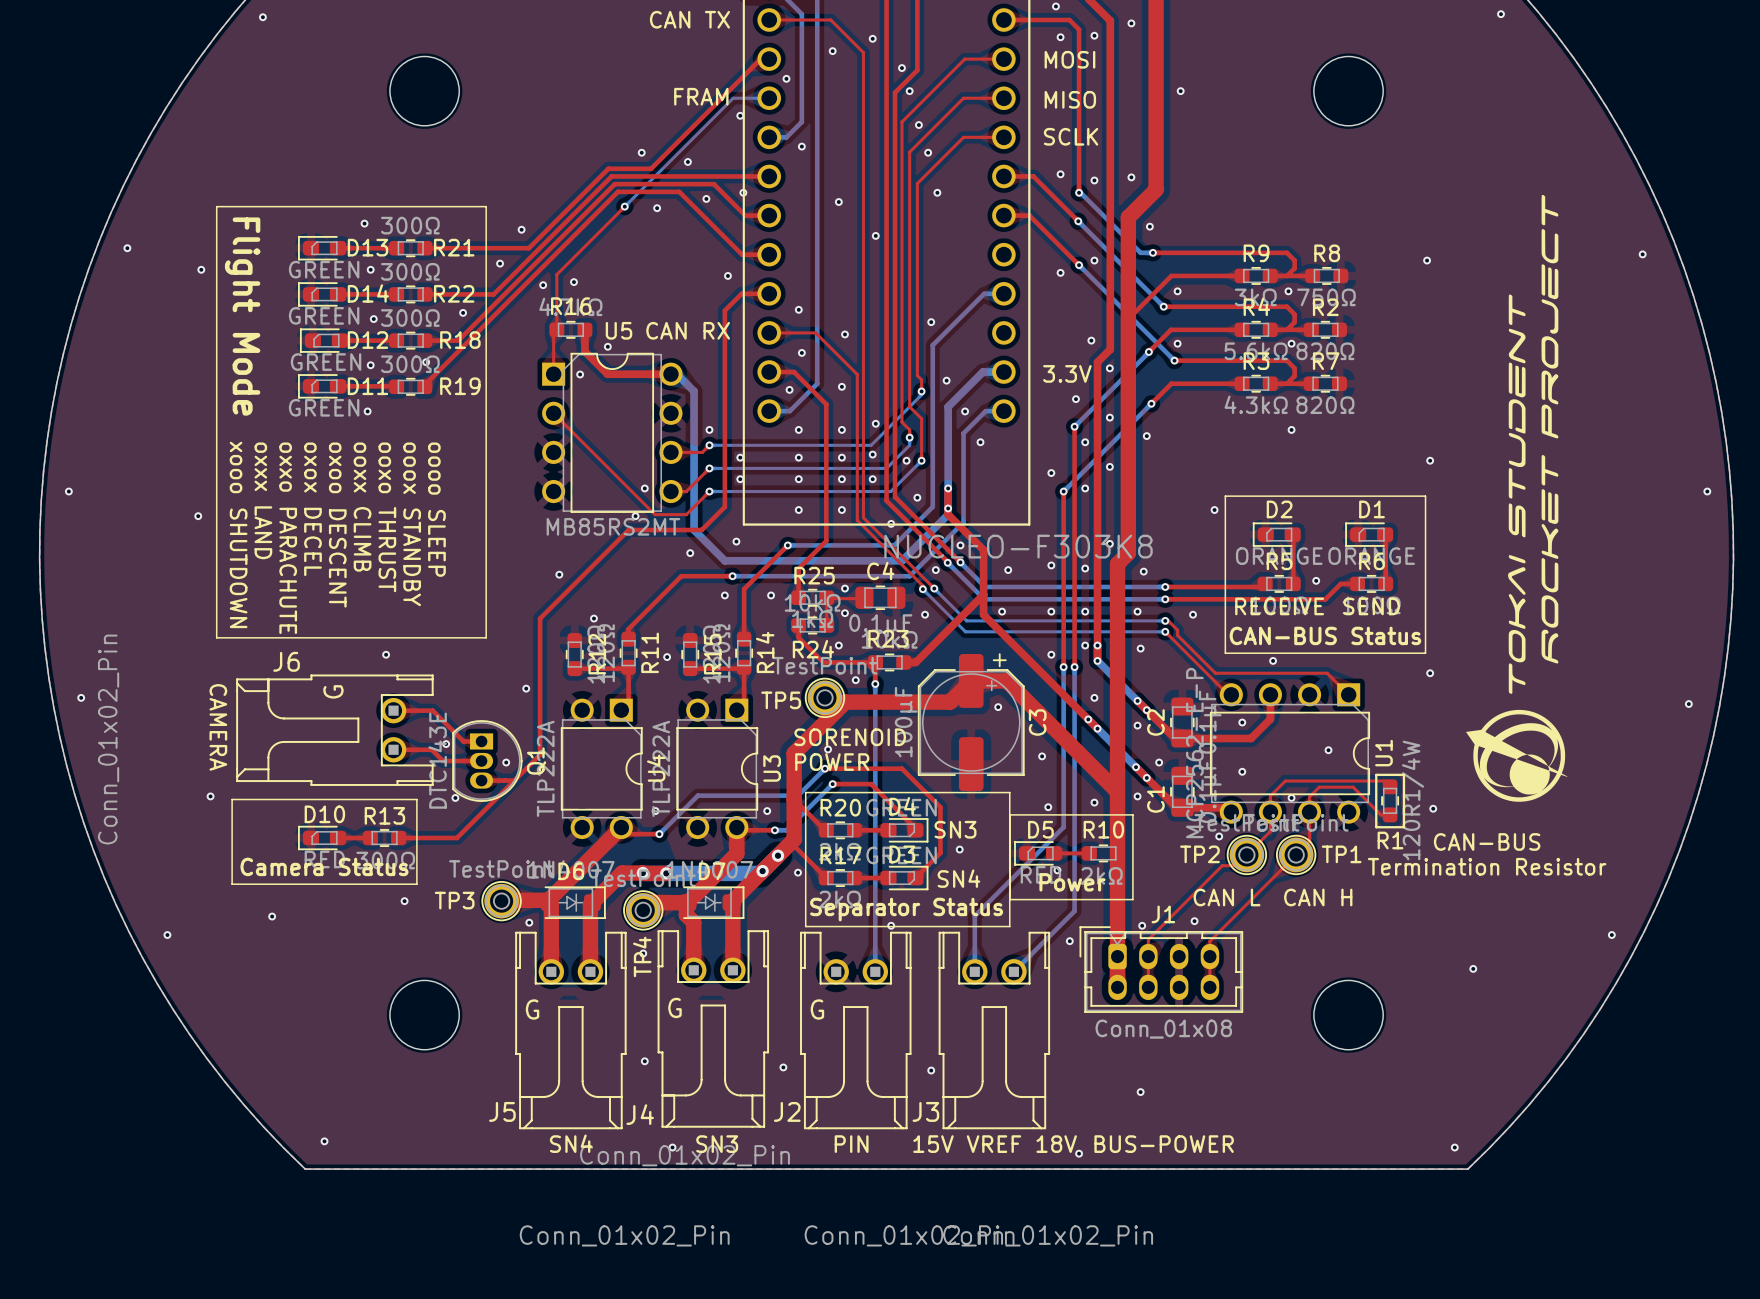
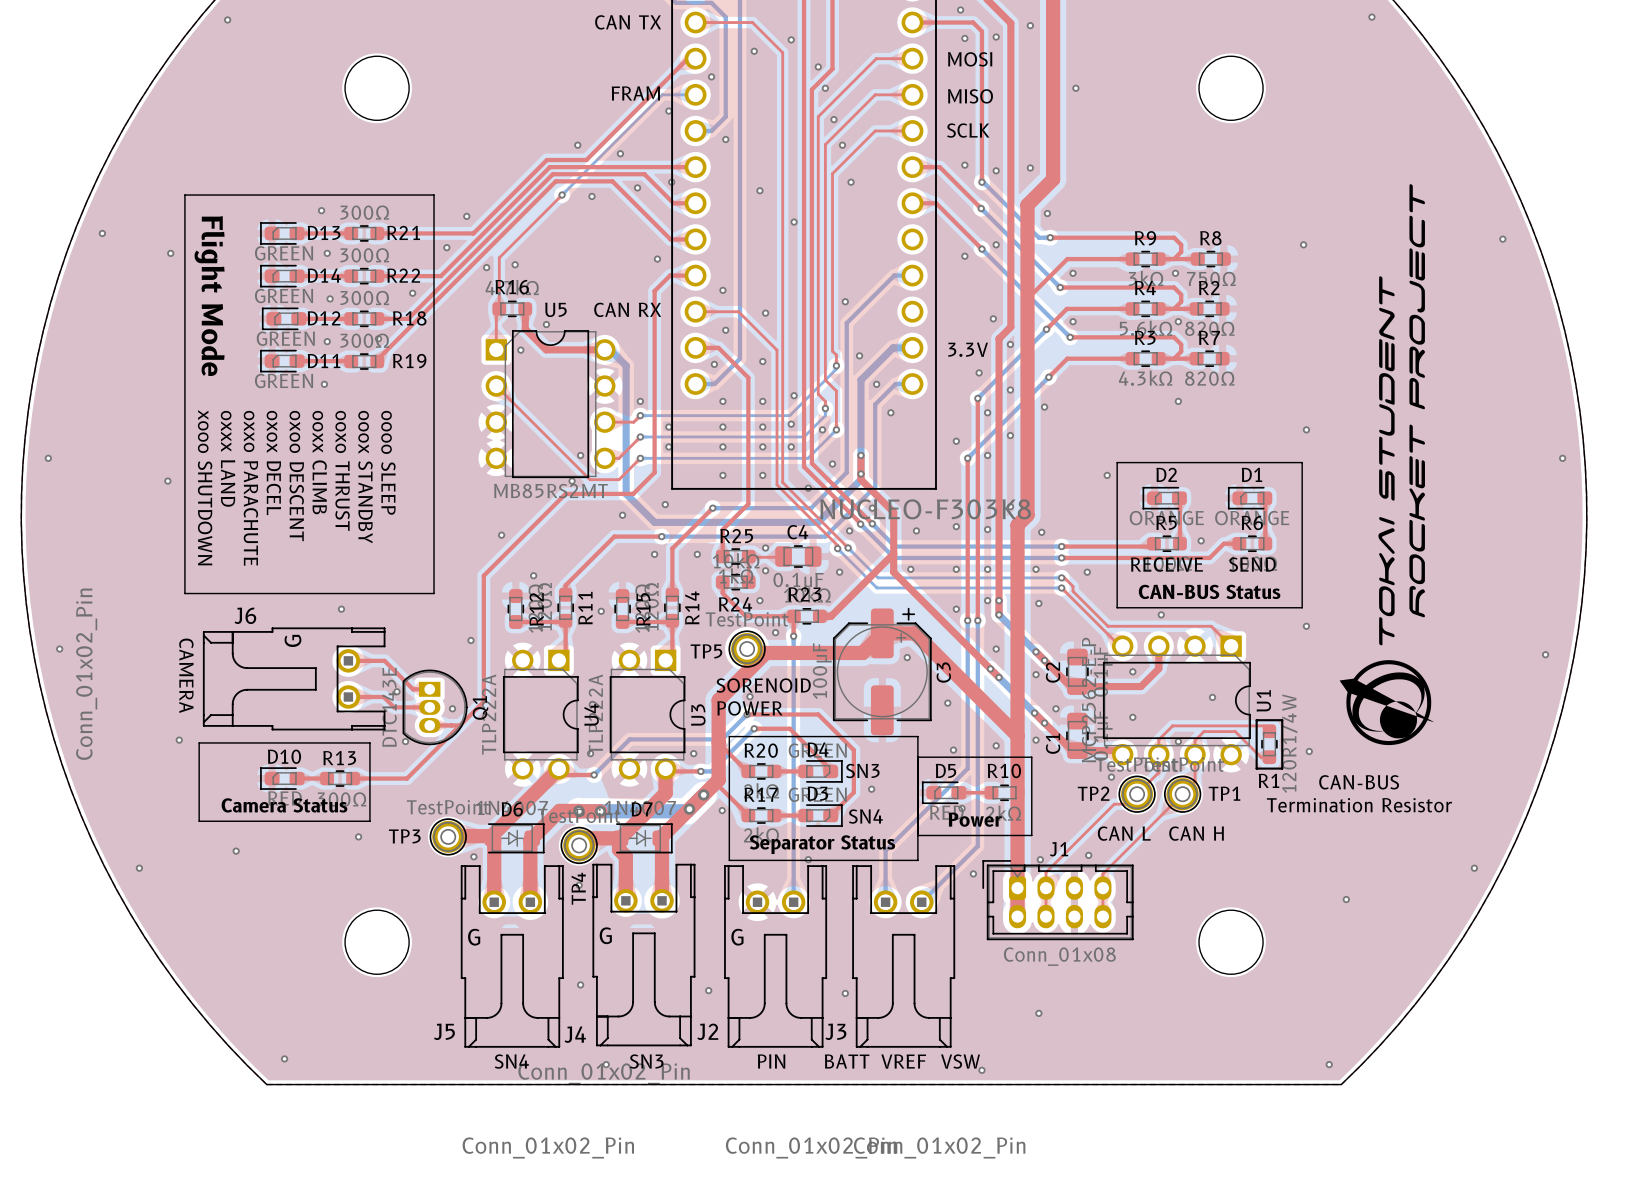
text: 15V (933, 1144) -> BATT (847, 1061)
text: 18V (1056, 1144) -> VSW (960, 1061)
text: BUS-POWER (1164, 1144) -> none

